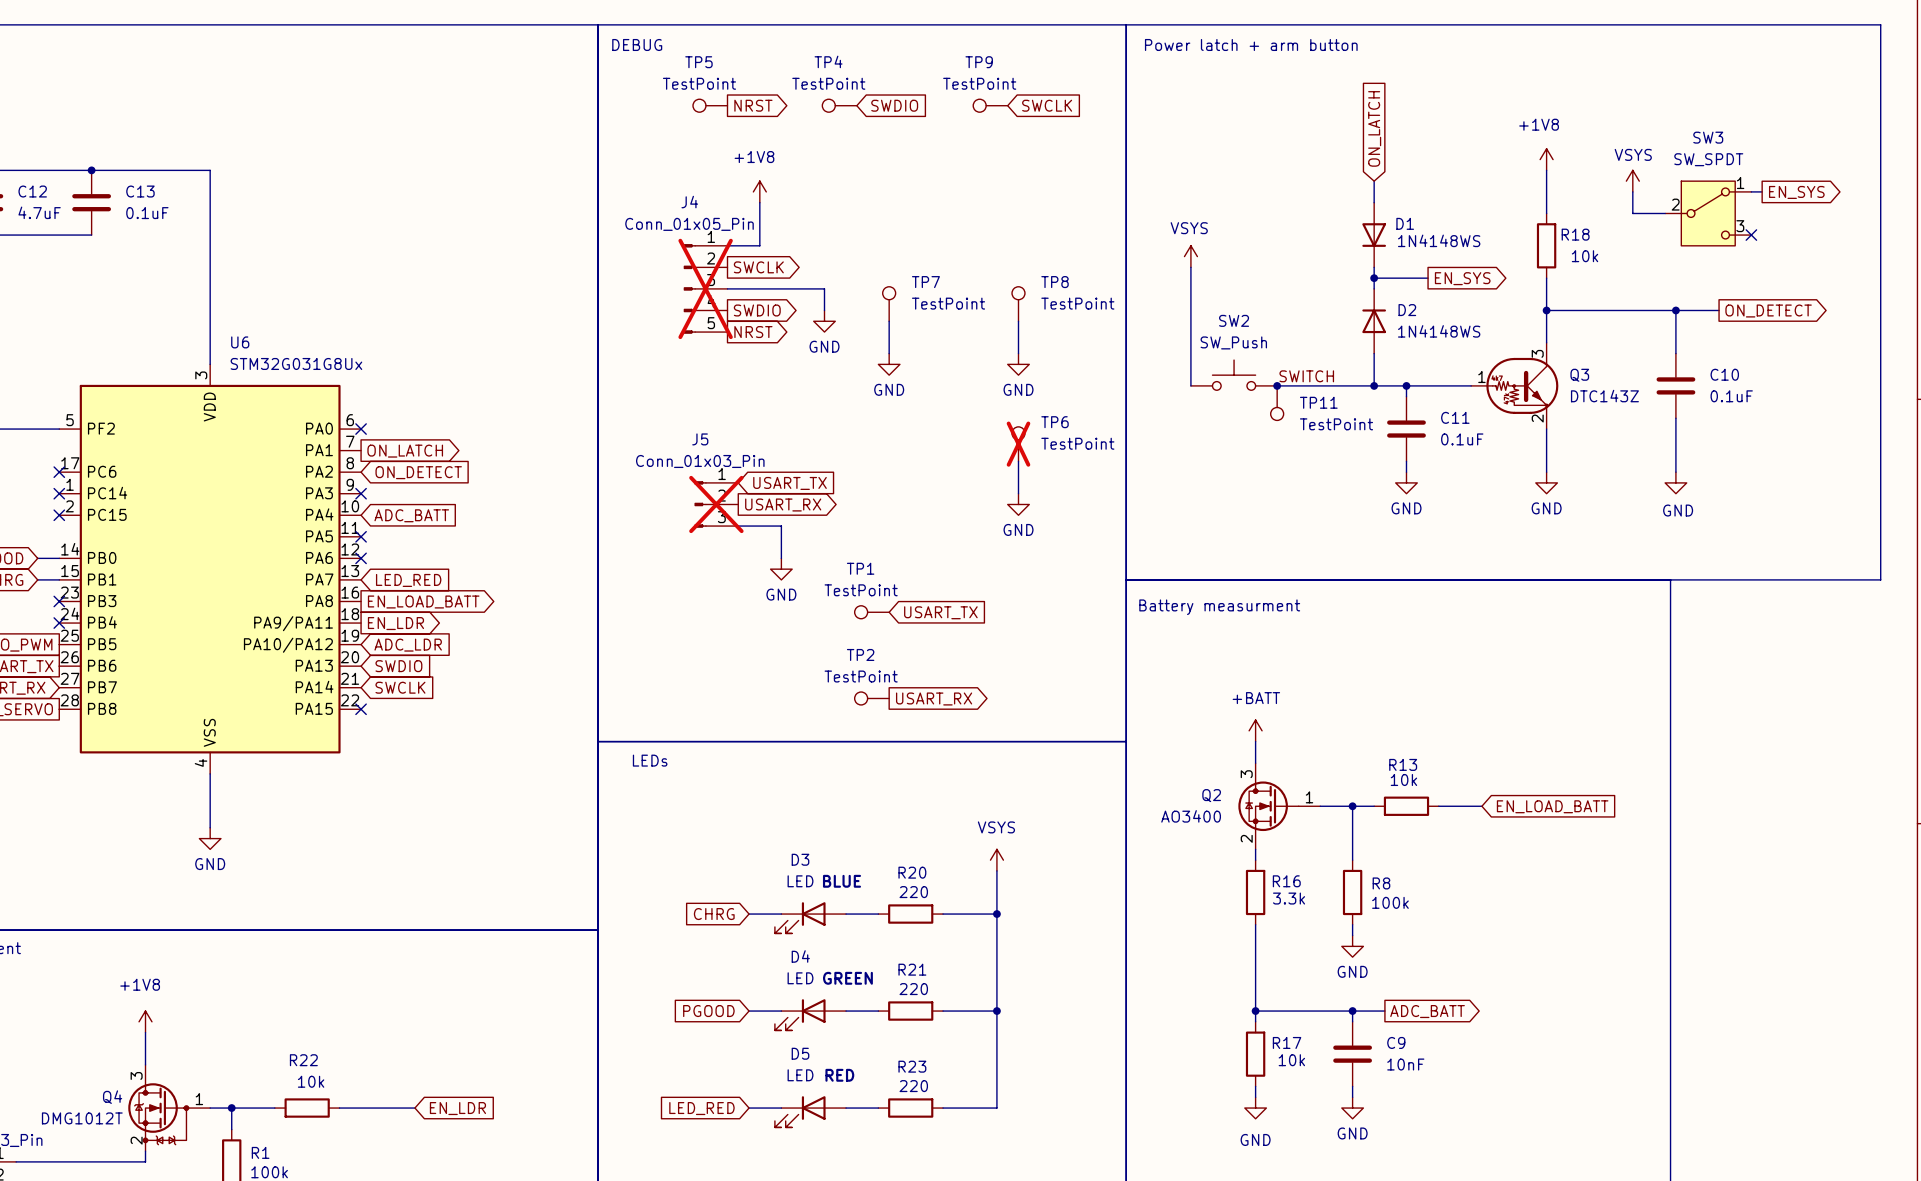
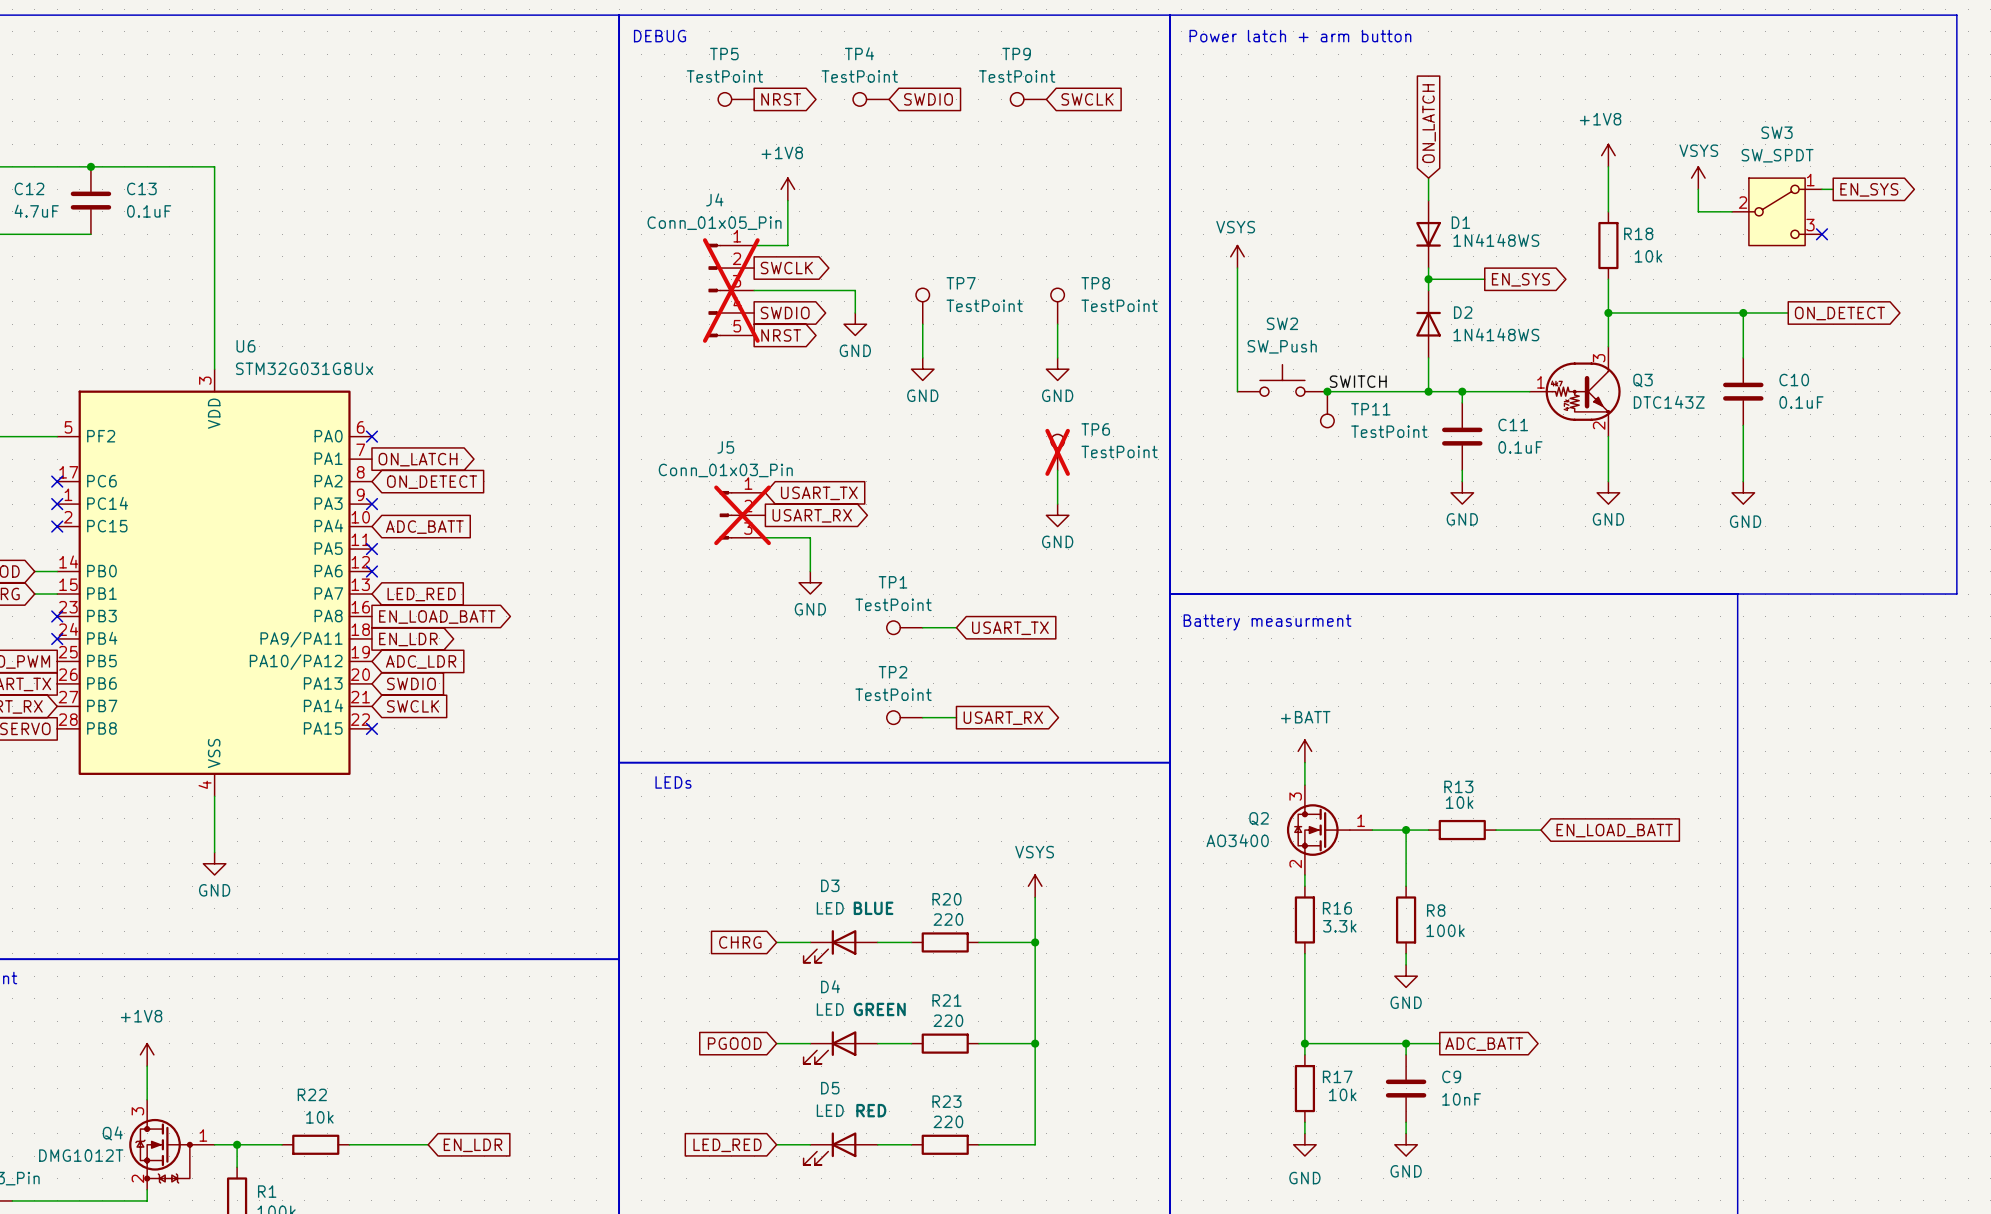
wire: none -> (922, 627) (956, 627)
global label position: USART_TX (940, 612) -> USART_TX (1010, 628)
wire: none -> (922, 717) (956, 717)
global label position: USART_RX (934, 698) -> USART_RX (1003, 718)

